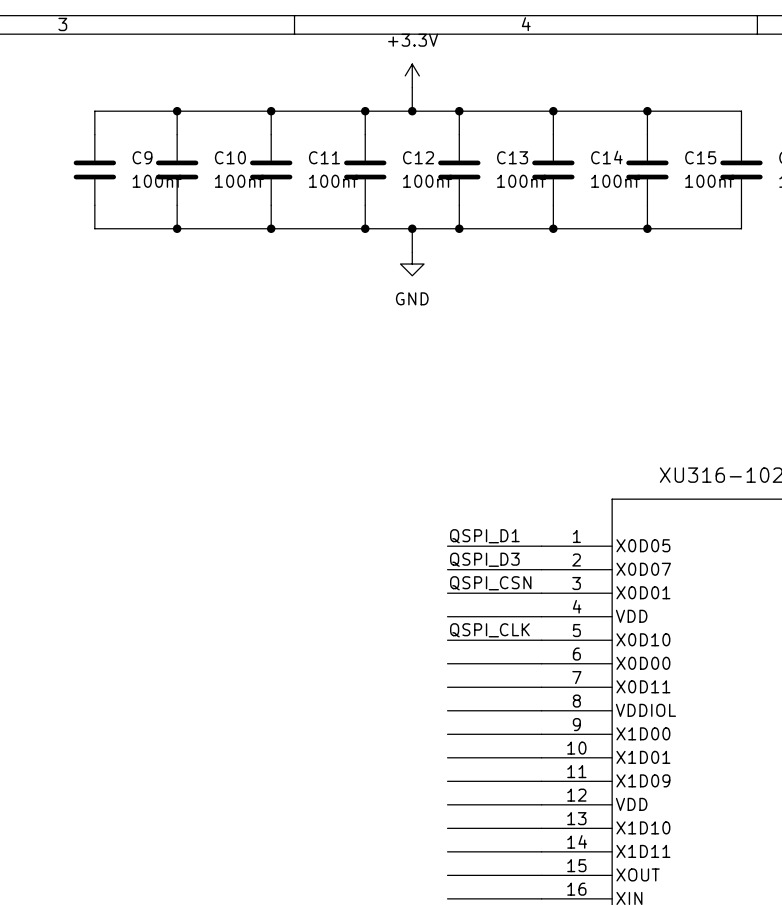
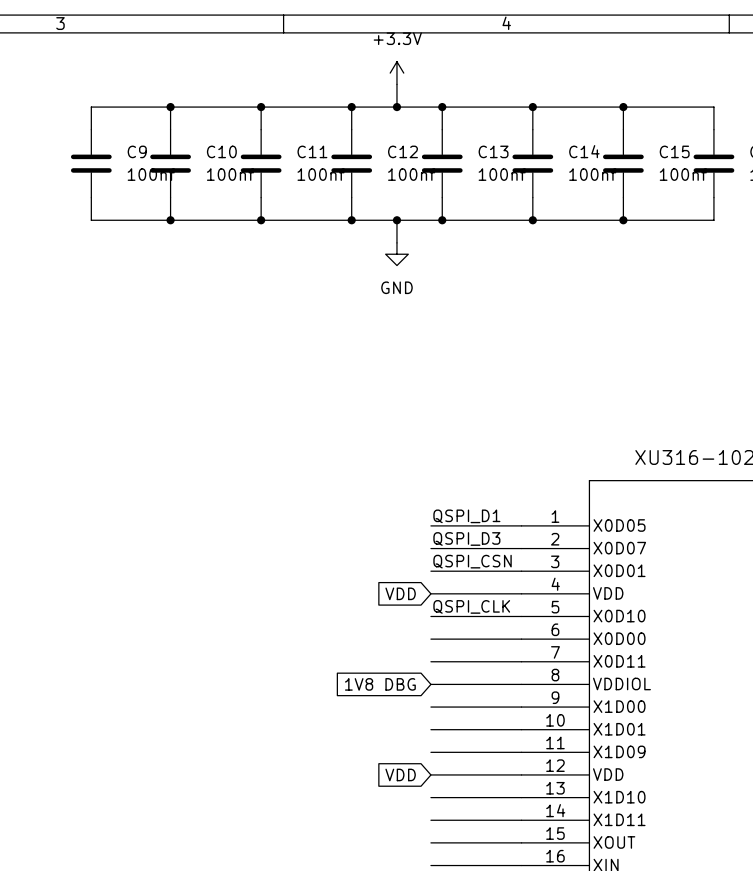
global label: none -> VDD (400, 593)
global label: none -> 1V8 DBG (380, 684)
global label: none -> VDD (400, 774)

